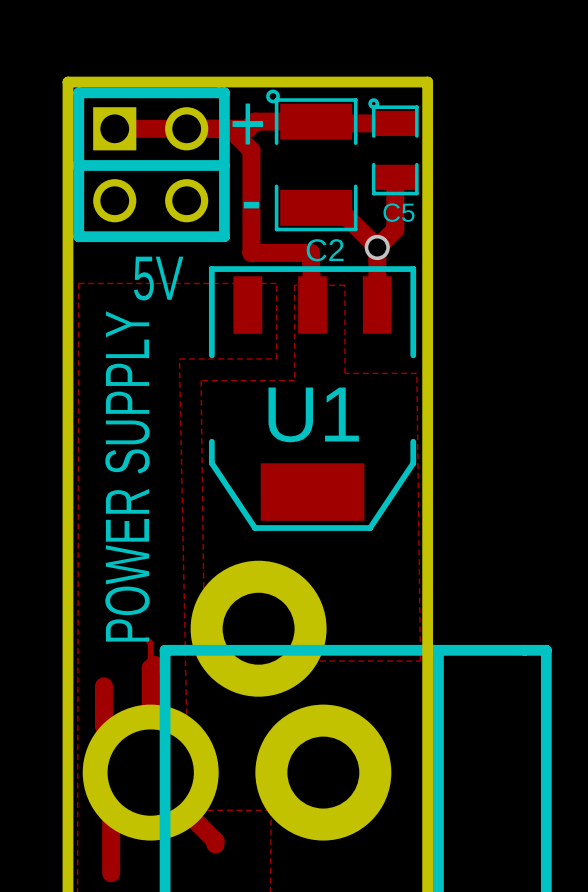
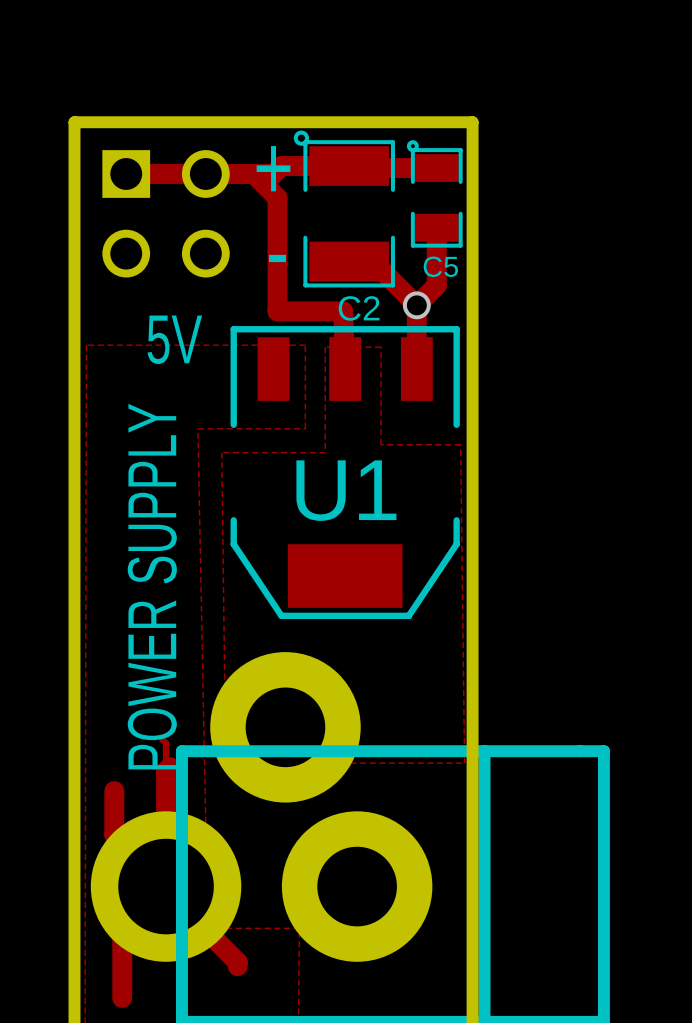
line: (78, 92) (78, 236) (224, 236) (224, 92) (78, 92) -> none
line: (77, 165) (224, 165) -> none
text position: POWER SUPPLY (127, 476) -> POWER SUPPLY (152, 586)

